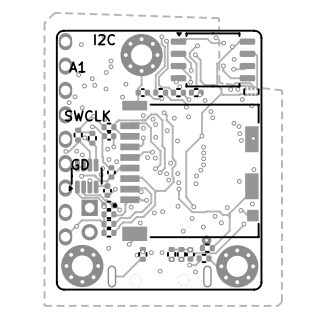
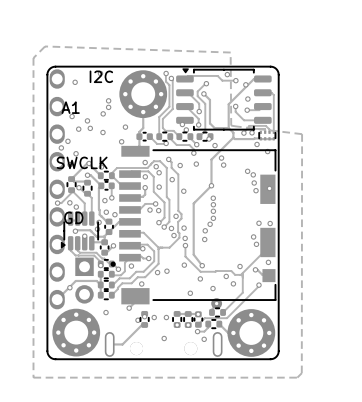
via: none -> (258, 223)
via: none -> (256, 244)

